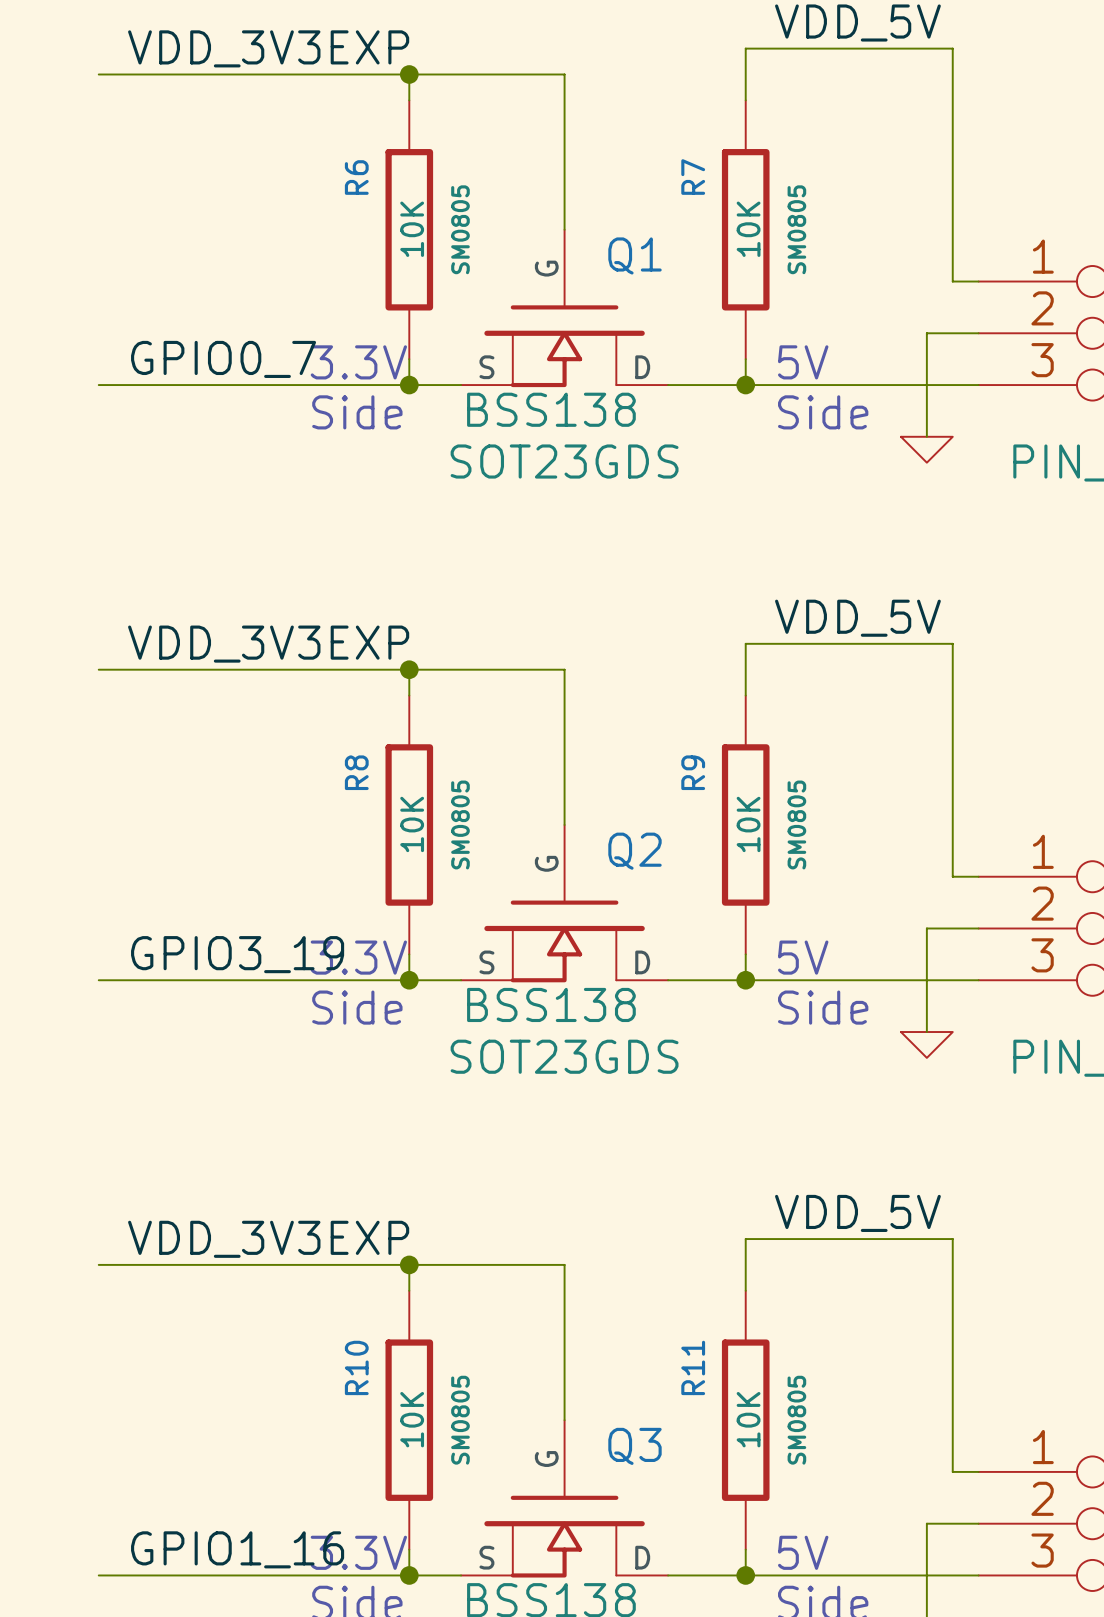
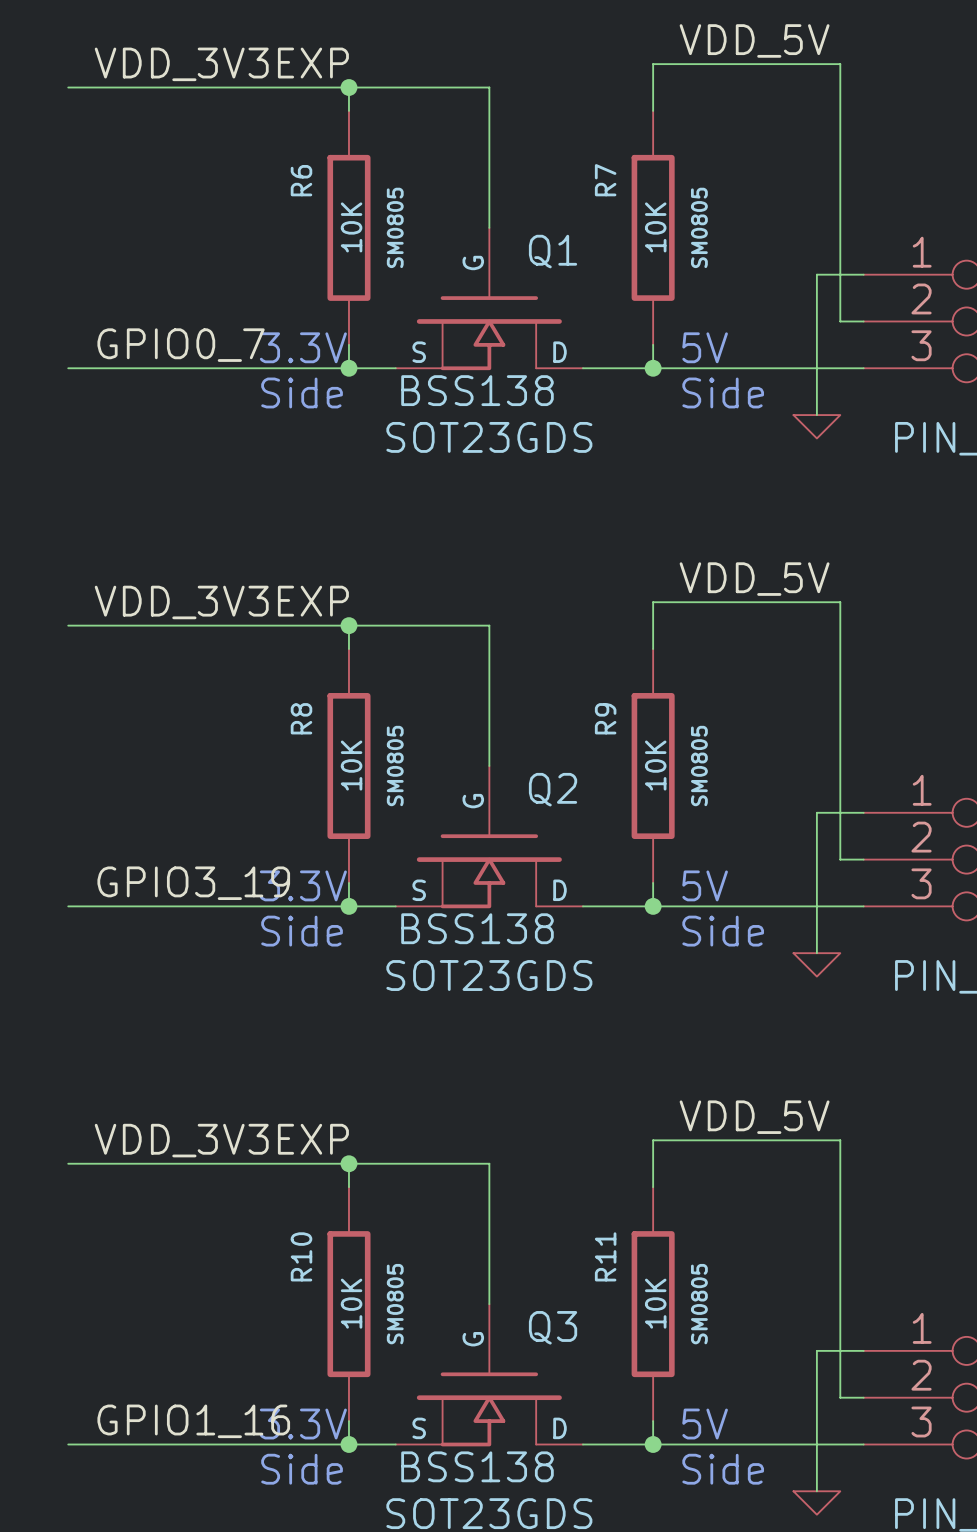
wire: (926, 333) (952, 333) -> (816, 321) (816, 274) (840, 274) (840, 321)
wire: (926, 928) (952, 928) -> (816, 859) (816, 812) (840, 812) (840, 859)
wire: (926, 1523) (952, 1523) -> (816, 1397) (816, 1350) (840, 1350) (840, 1397)

